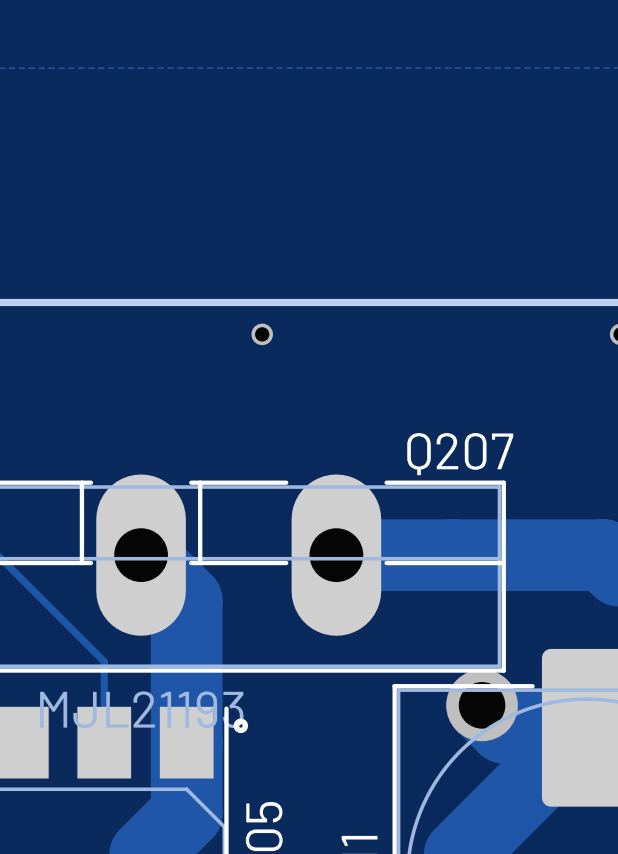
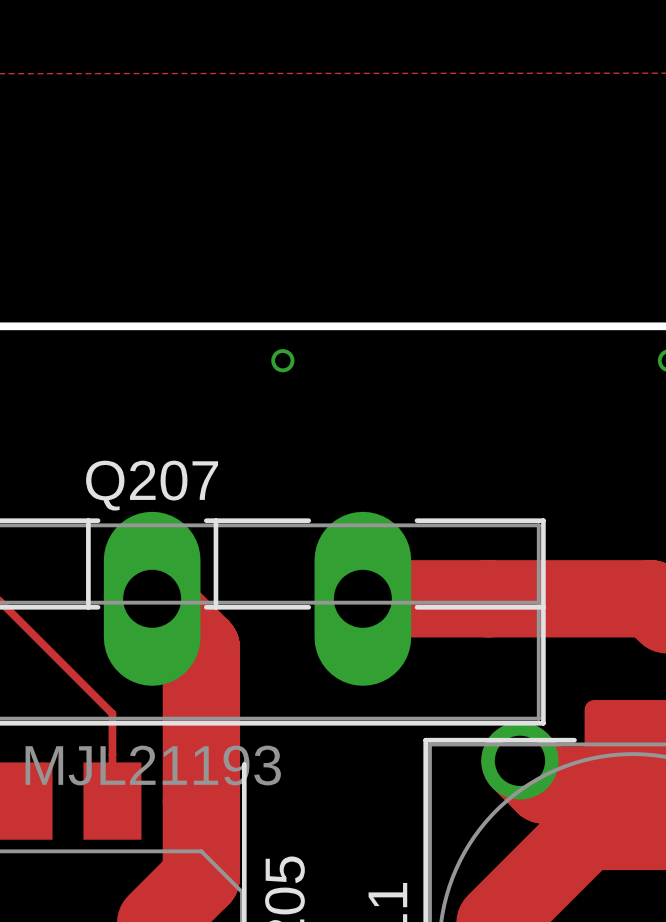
Q207 name position: Q207 (460, 454) -> Q207 (152, 485)
drawing: [233, 718, 249, 734] -> none

